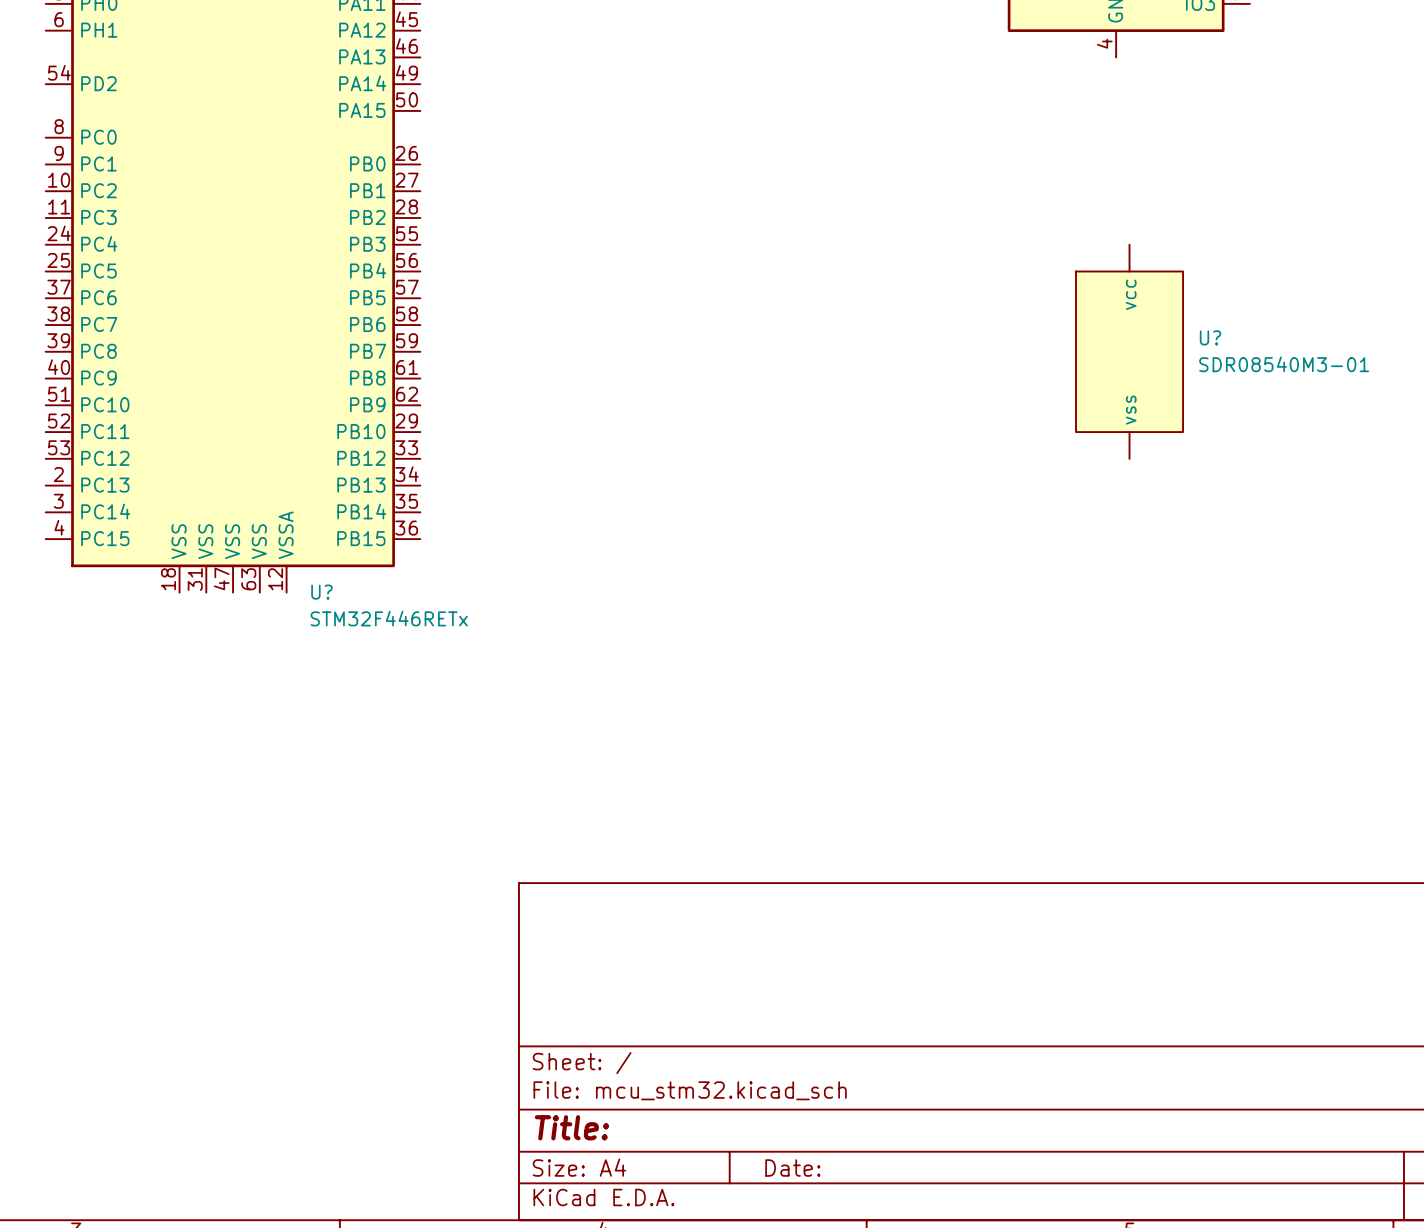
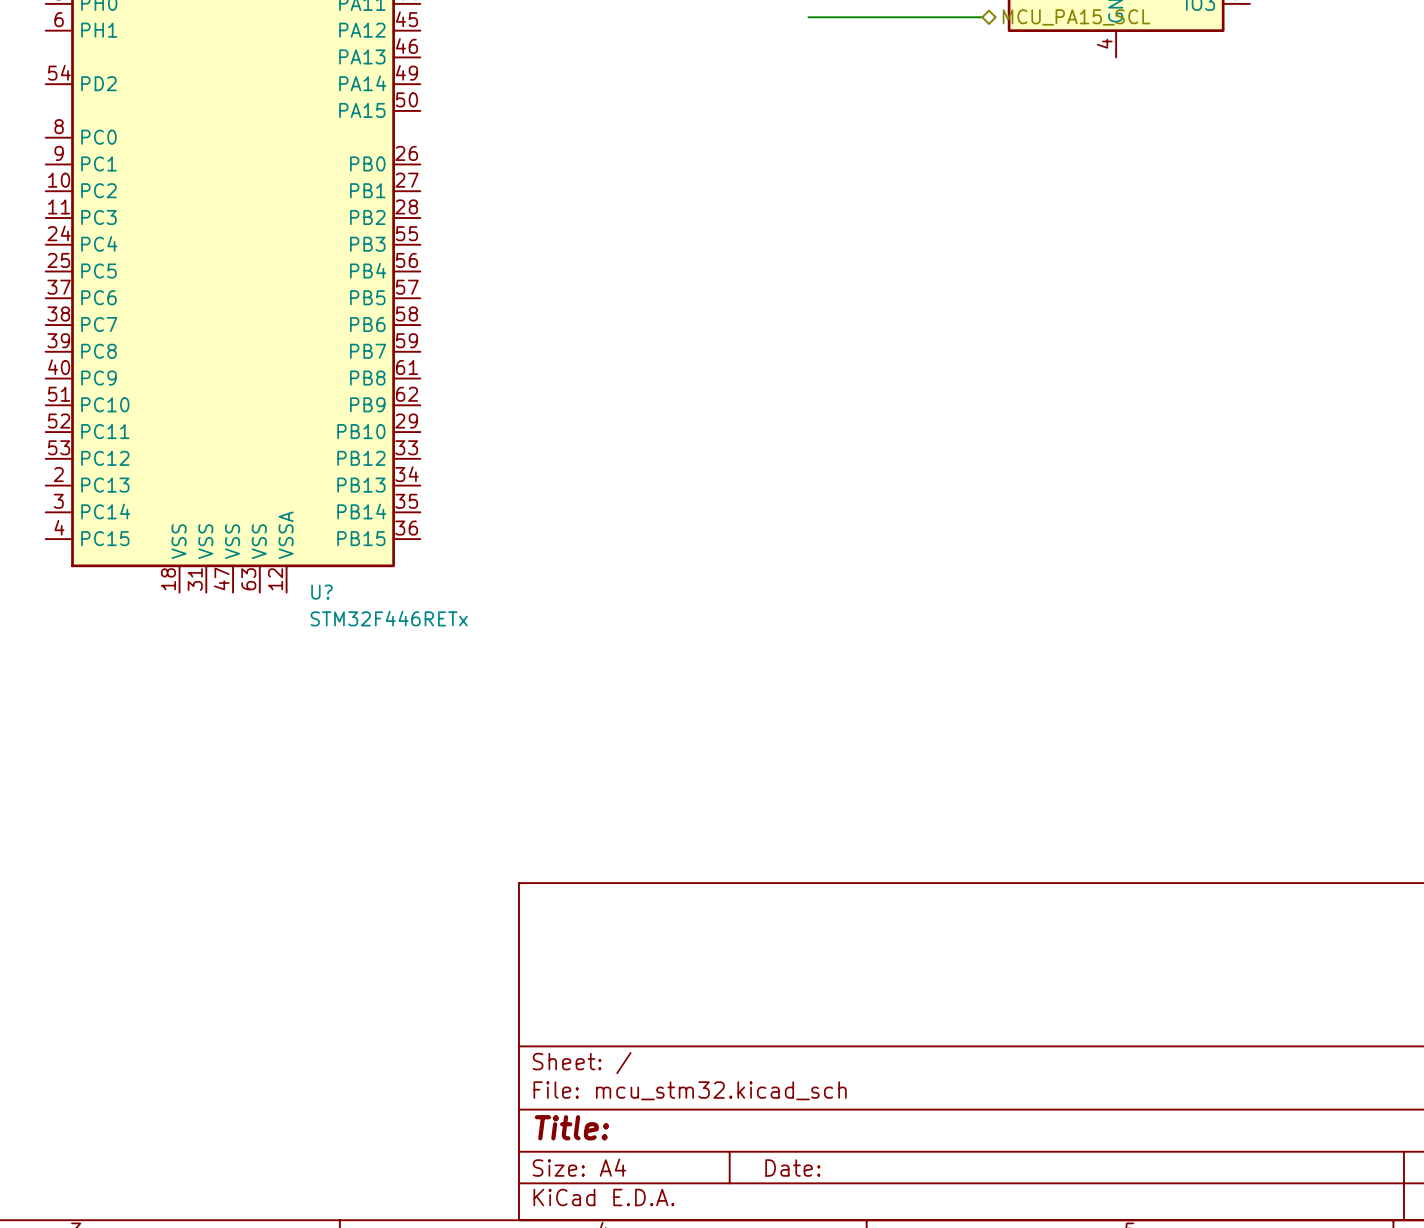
wire: none -> (808, 17) (982, 17)
hierarchical label: none -> MCU_PA15_SCL (1076, 17)
U?: SDR08540M3-01 (1129, 351) -> none

